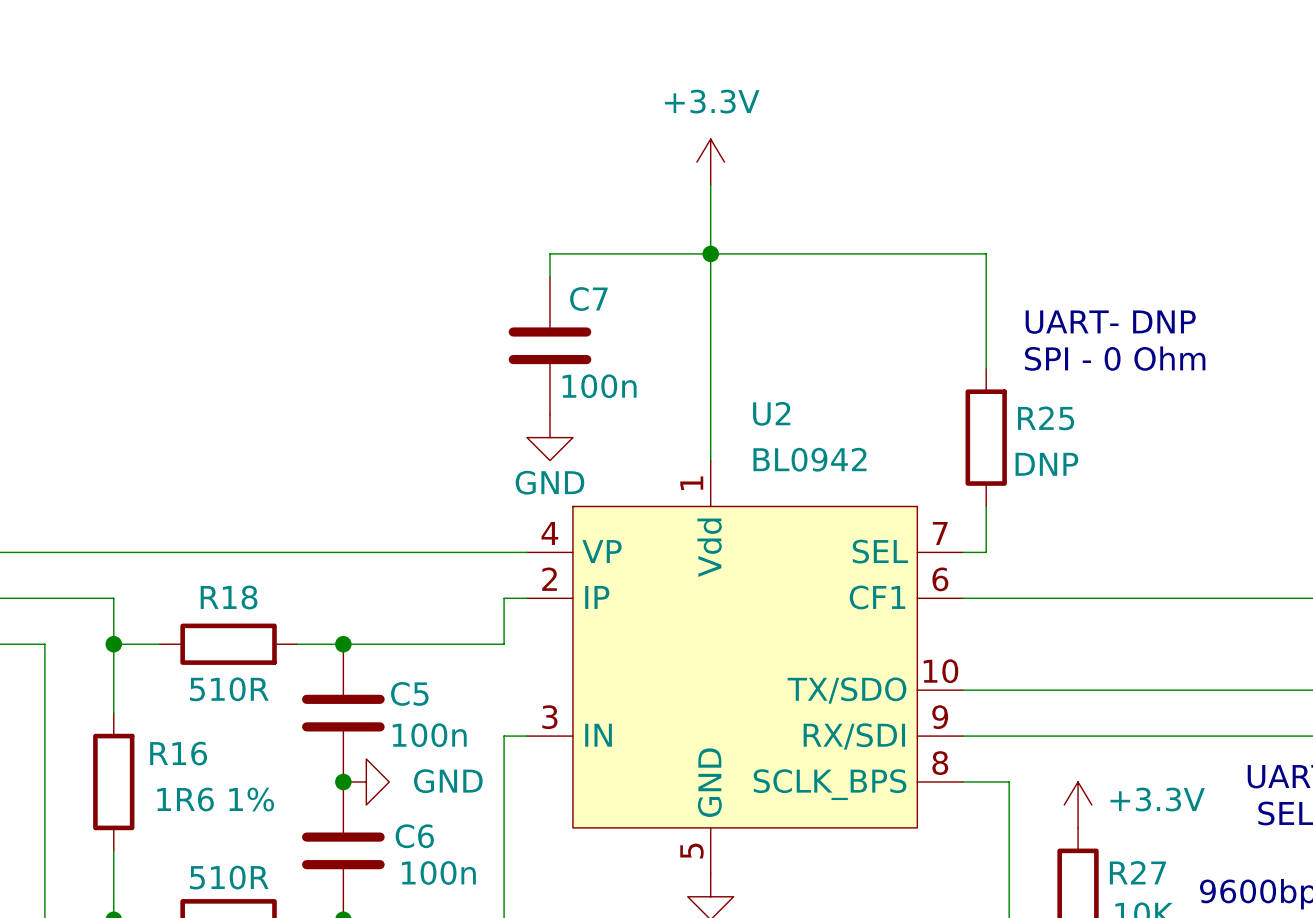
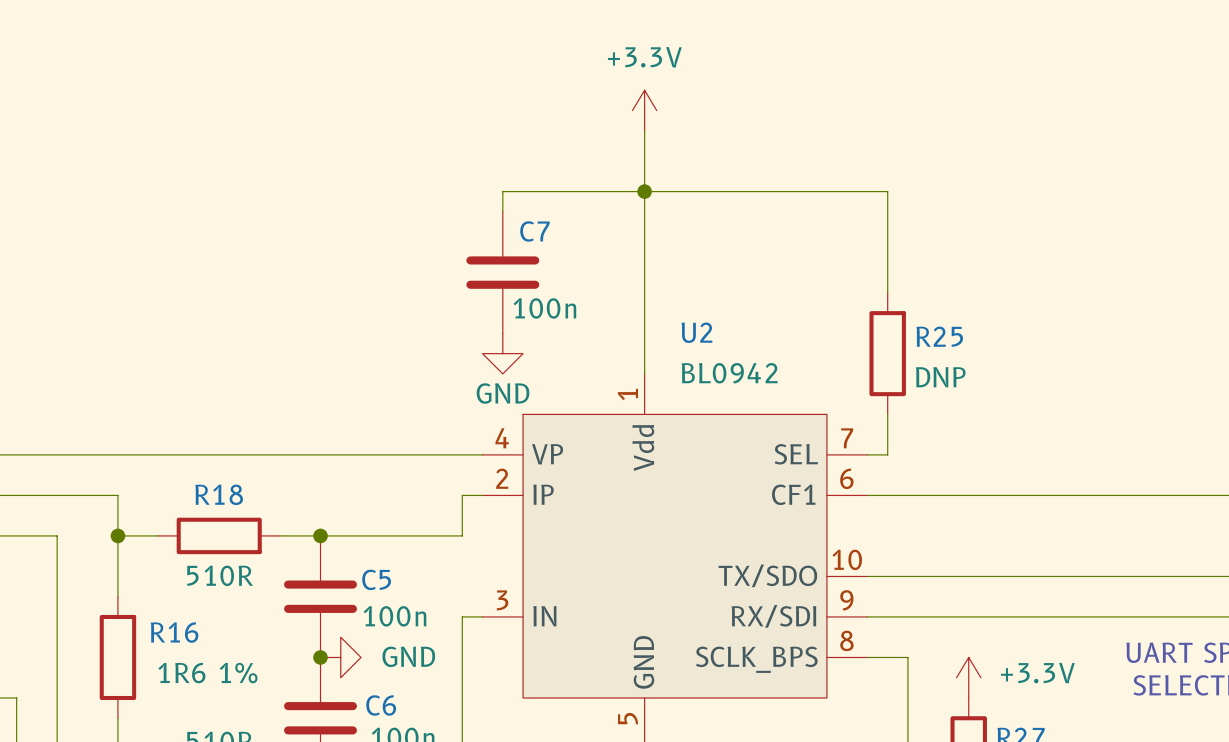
text: UART- DNP (1110, 322) -> none
text: SPI - 0 Ohm (1115, 358) -> none

